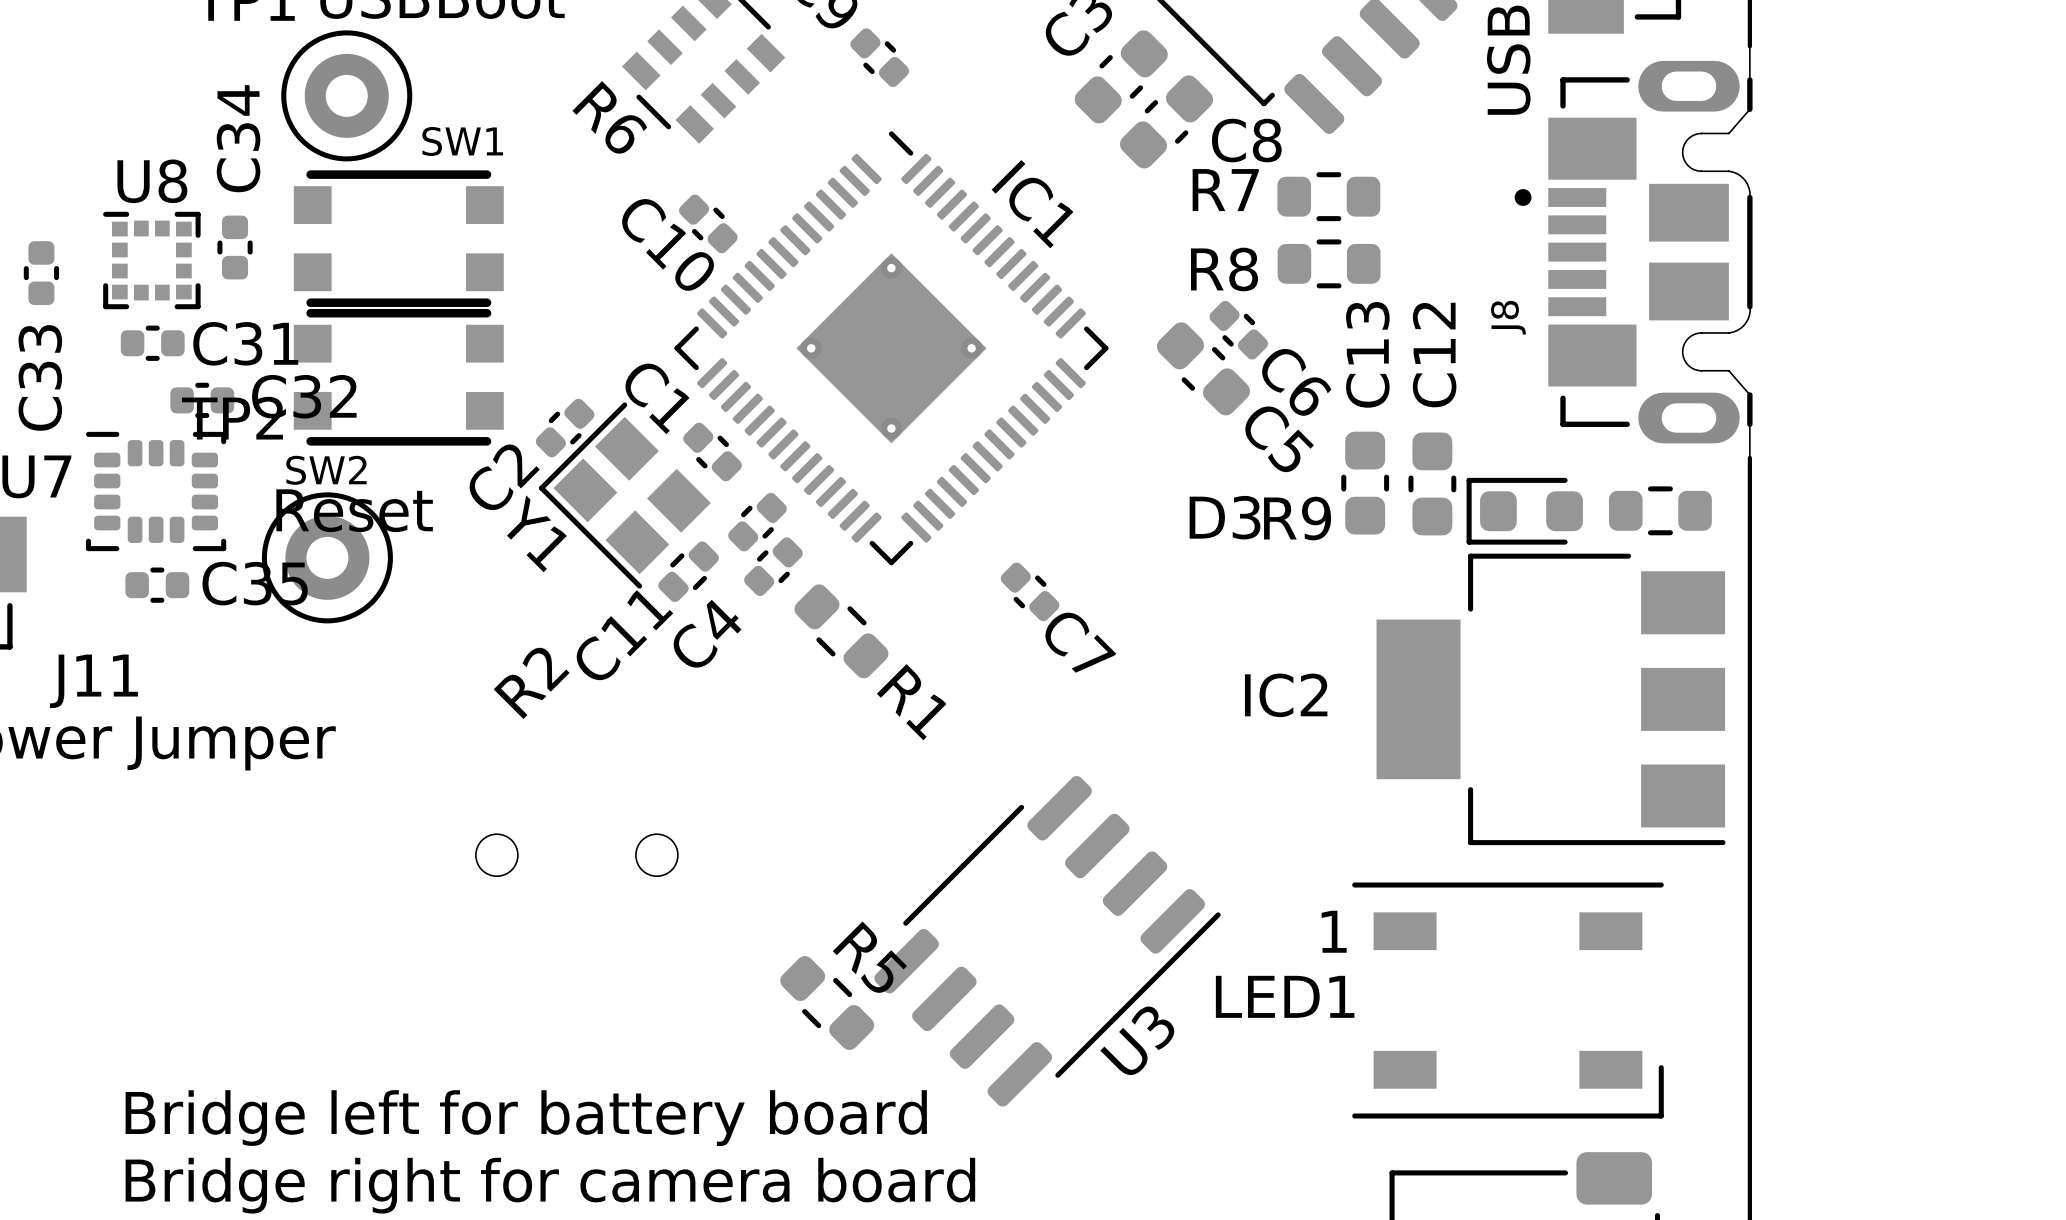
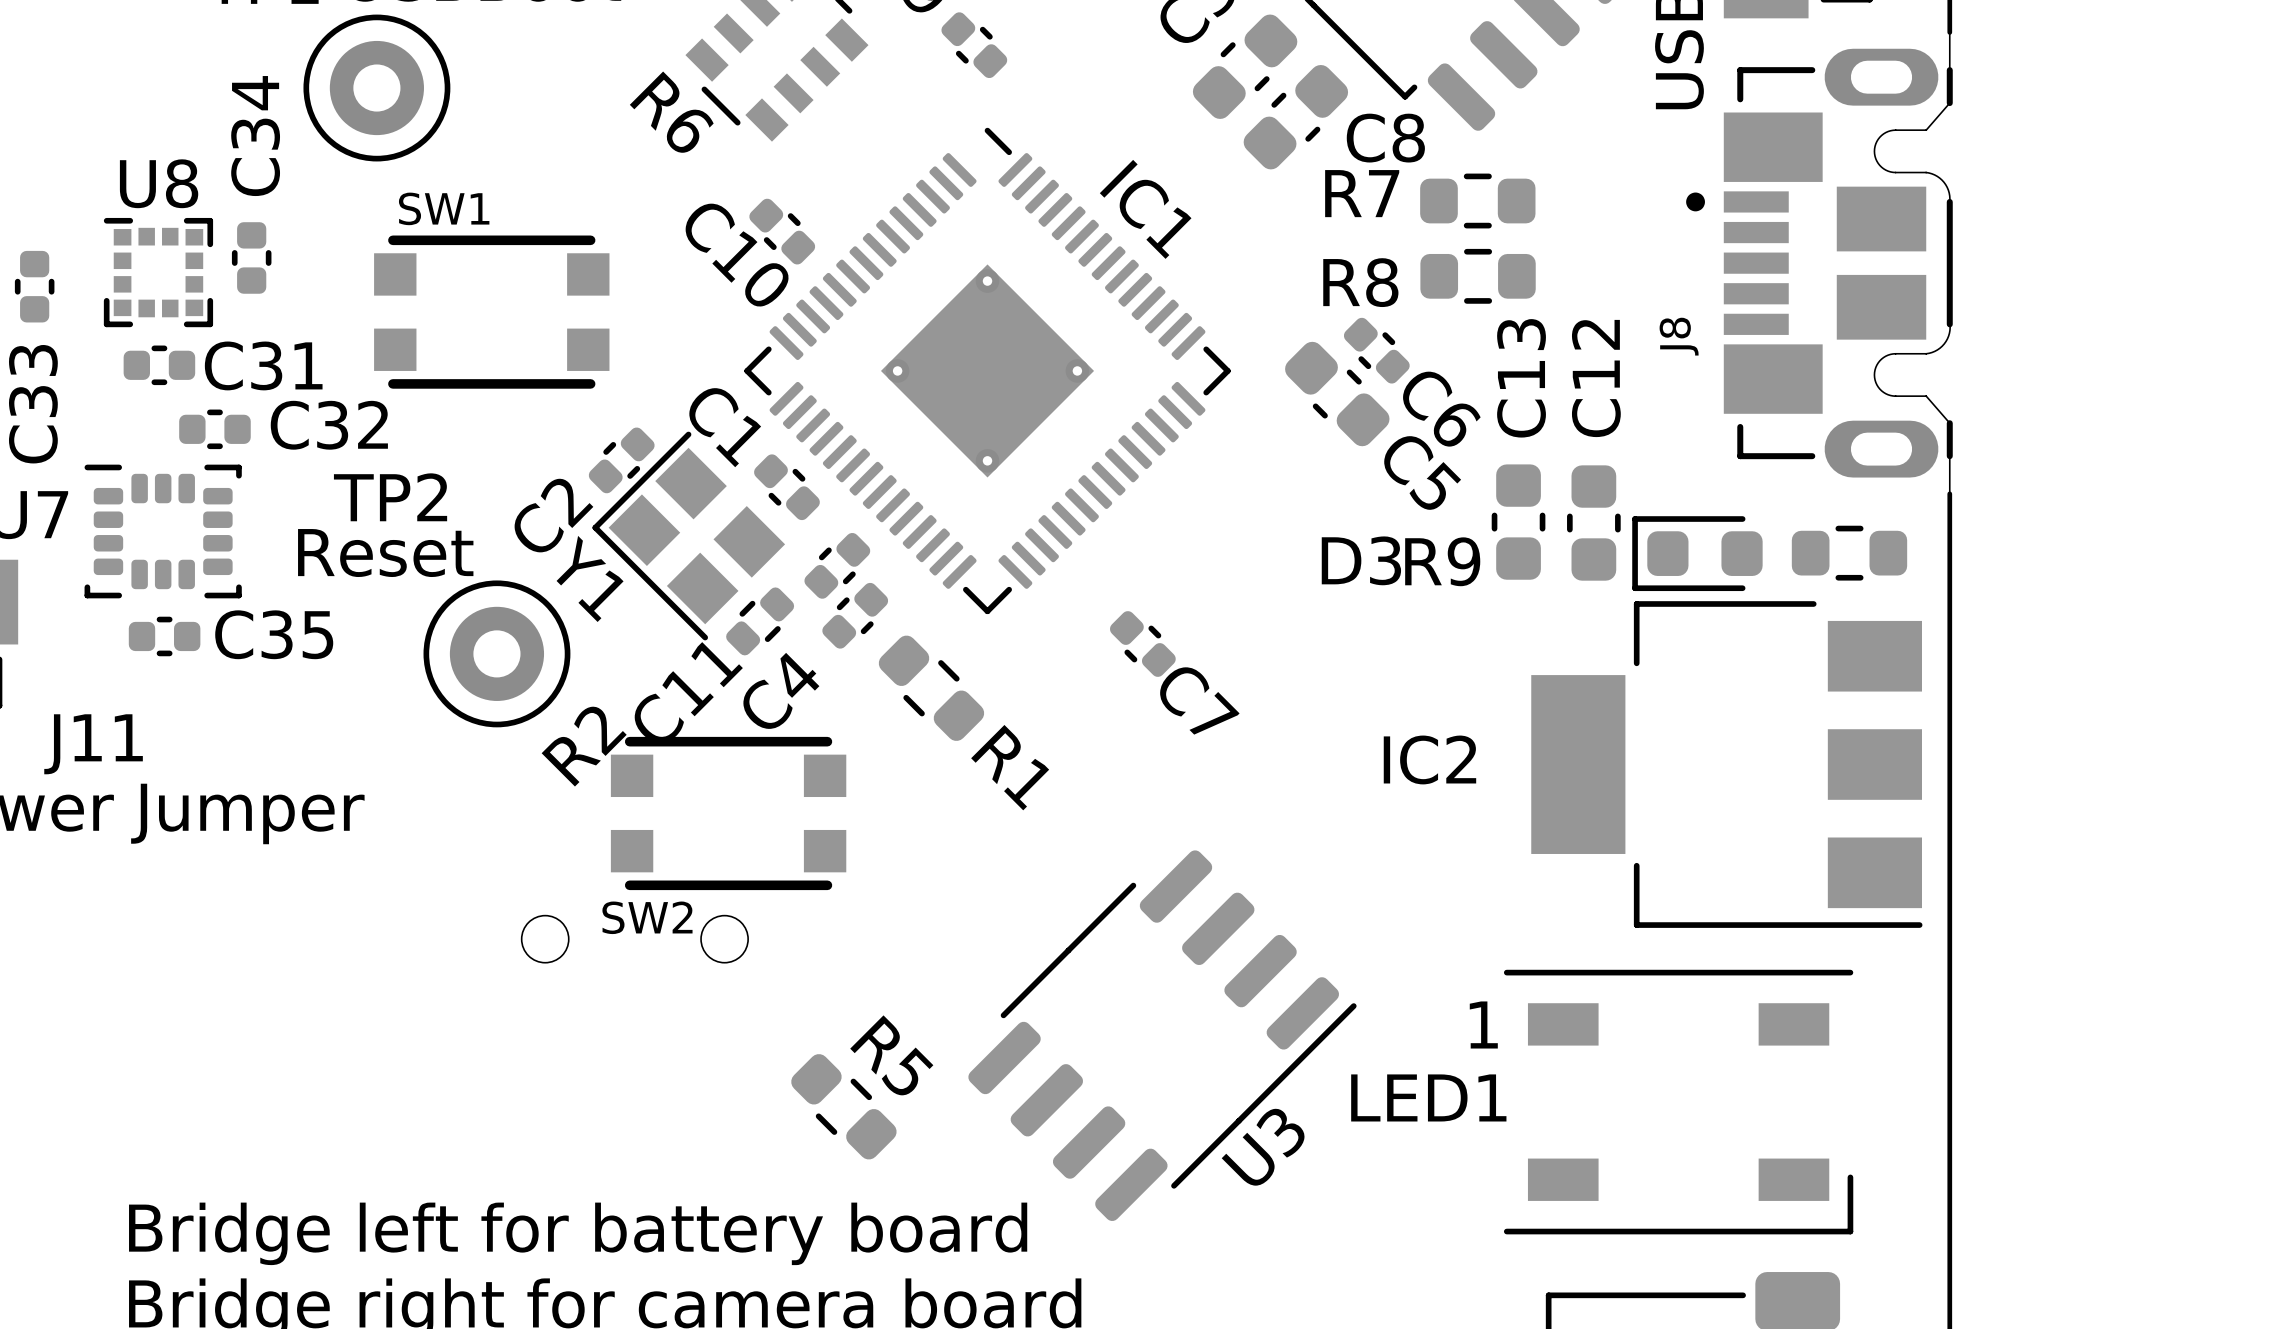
SW1 name position: SW1 (462, 141) -> SW1 (444, 208)
SW1 position: (398, 238) -> (491, 312)
SW2 position: (398, 377) -> (728, 813)
TP2 position: (327, 557) -> (496, 653)
R5 position: (827, 1003) -> (843, 1106)

